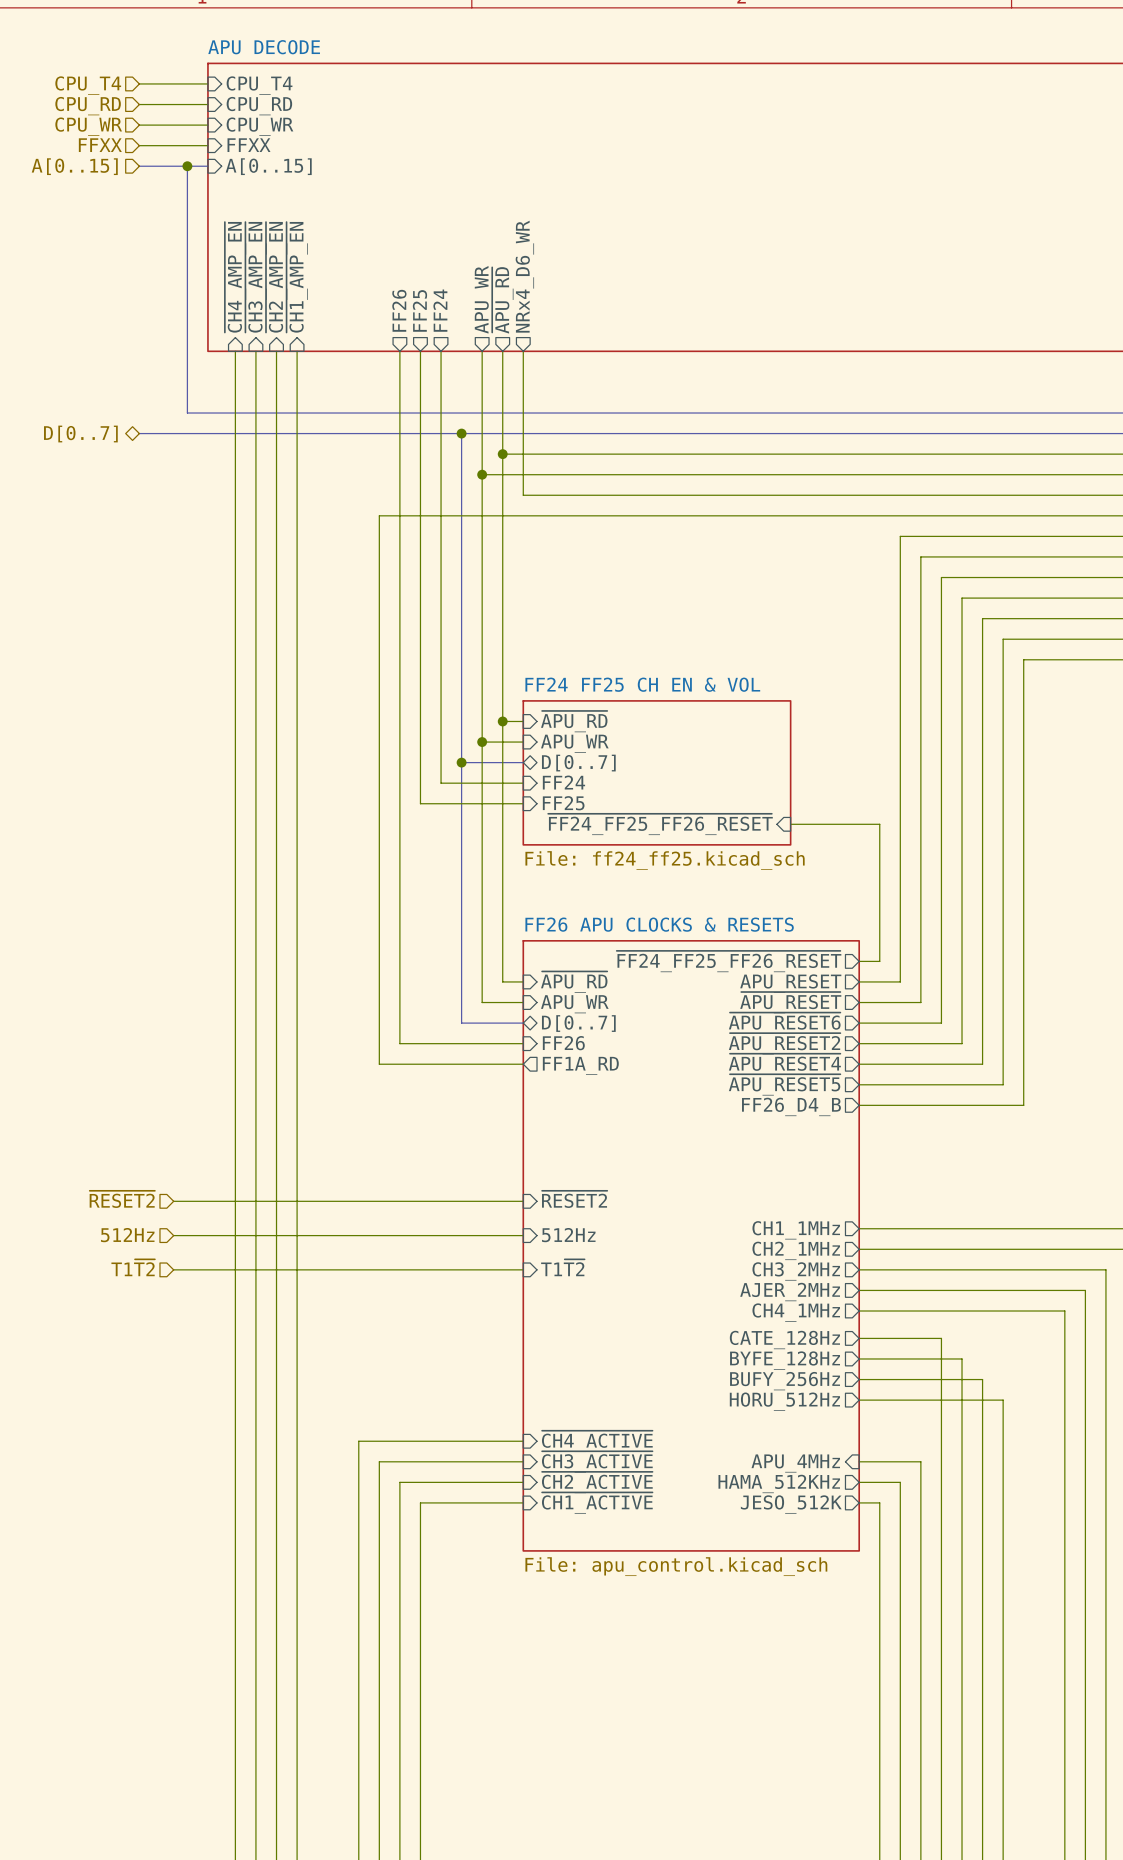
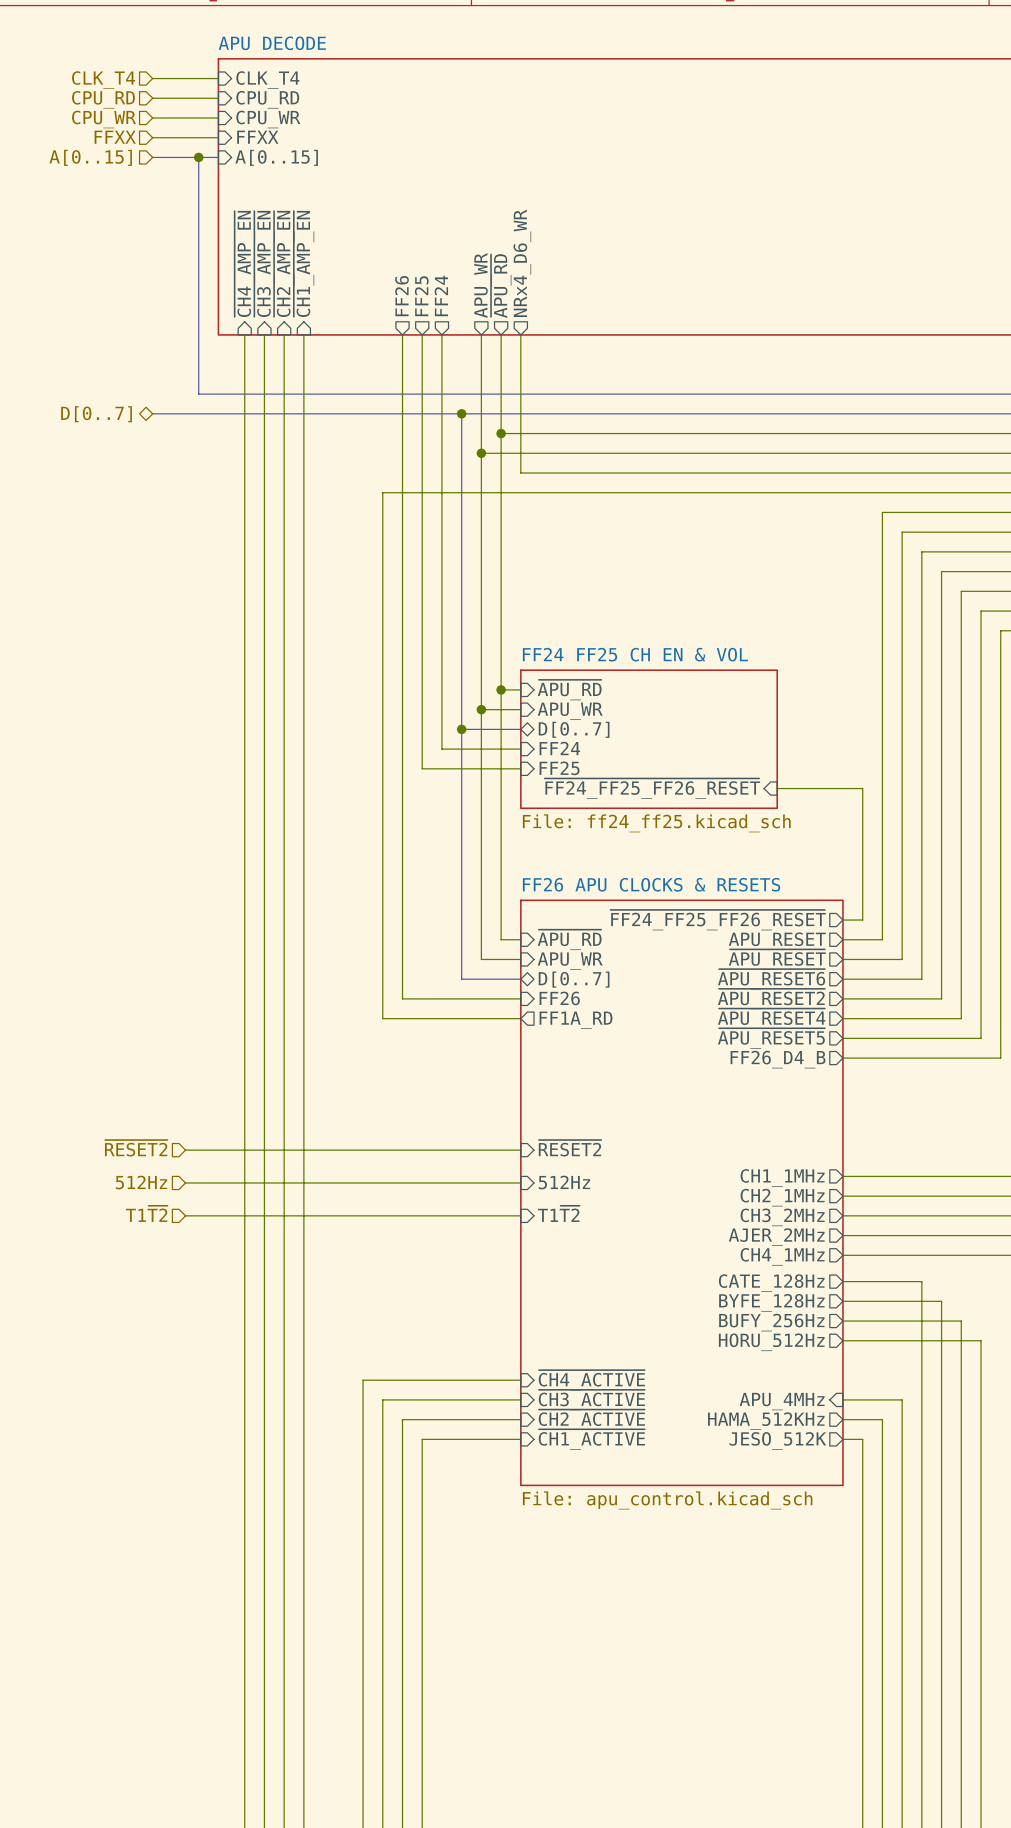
hierarchical label: CPU_T4 (88, 85) -> CLK_T4 (103, 80)
sheet pin: CPU_T4 (259, 85) -> CLK_T4 (267, 80)

